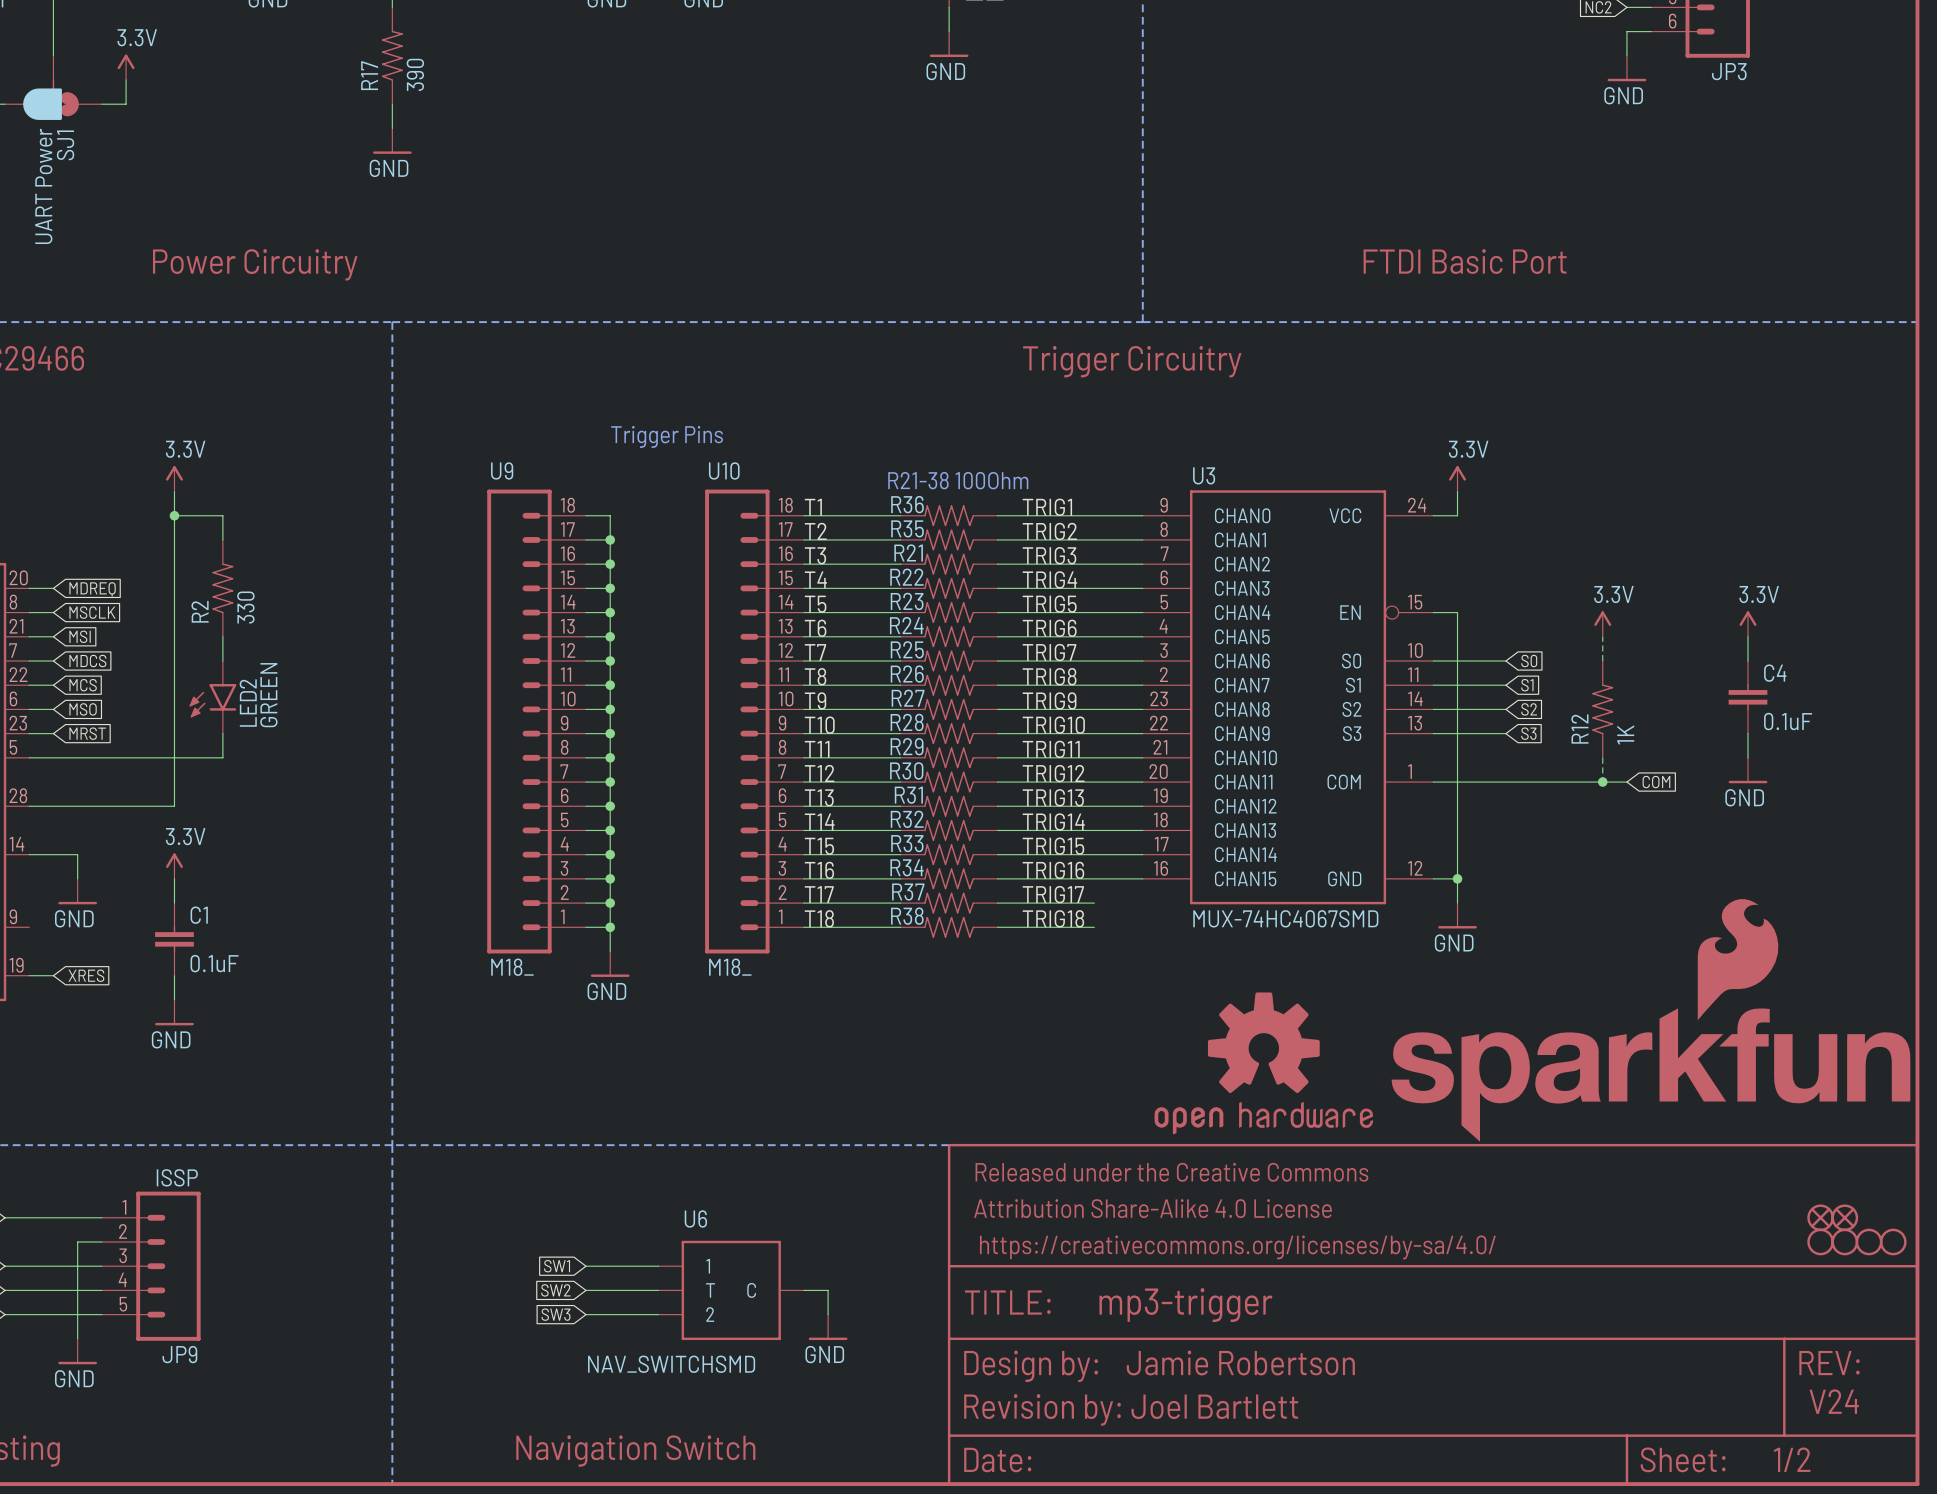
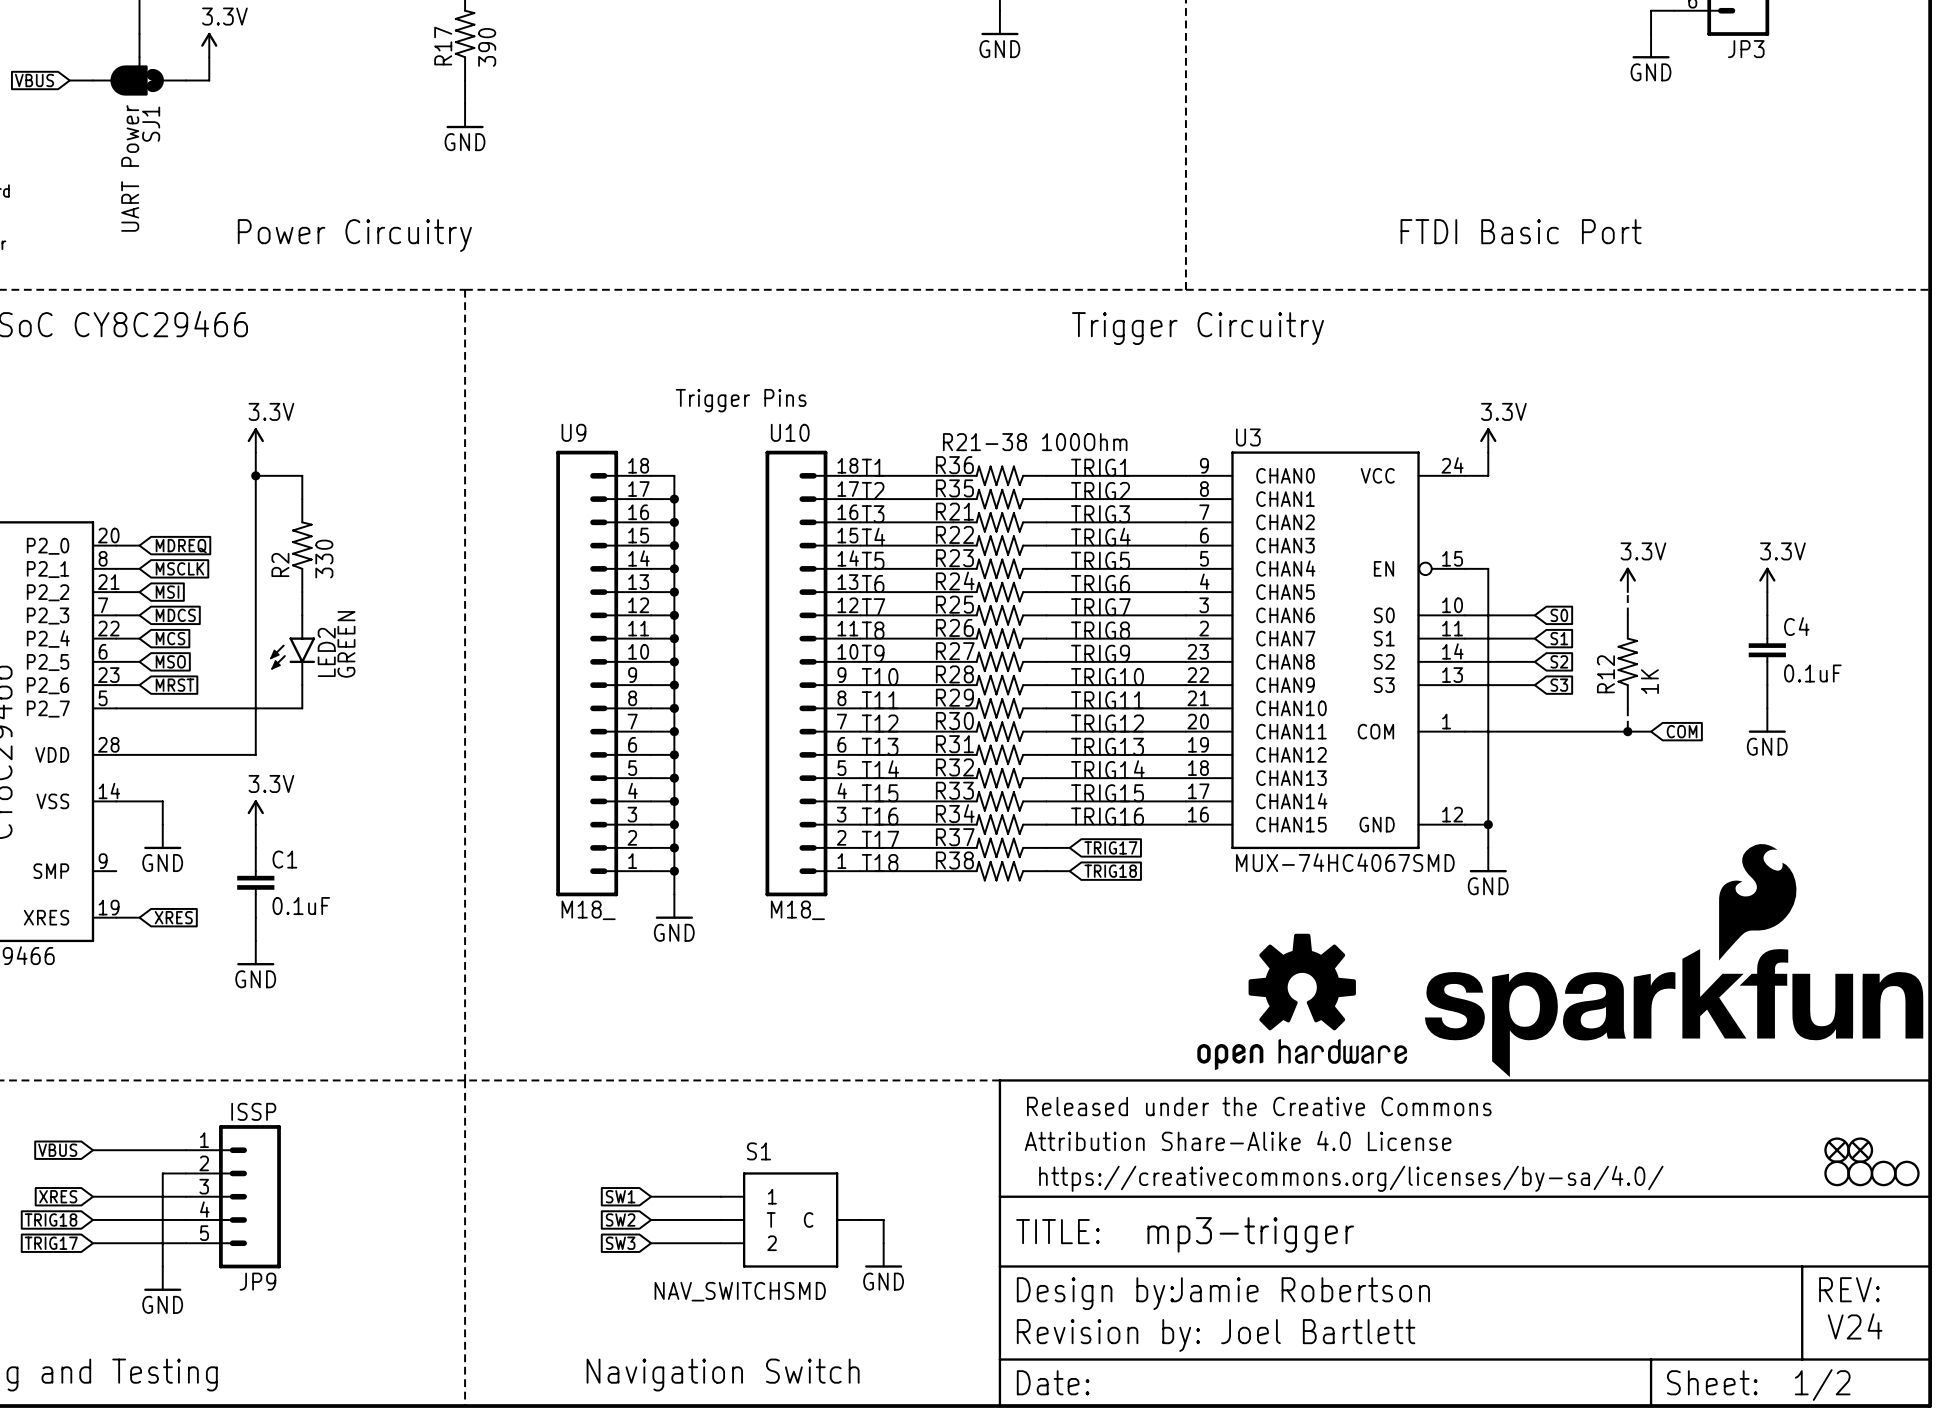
label: TRIG17 (1053, 894) -> none
wire: (1021, 903) (1094, 903) -> none
global label: none -> TRIG17 (1110, 847)
label: TRIG18 (1053, 918) -> none
wire: (1021, 927) (1094, 927) -> none
global label: none -> TRIG18 (1110, 871)
U6 name: U6 (695, 1219) -> S1 (758, 1151)

